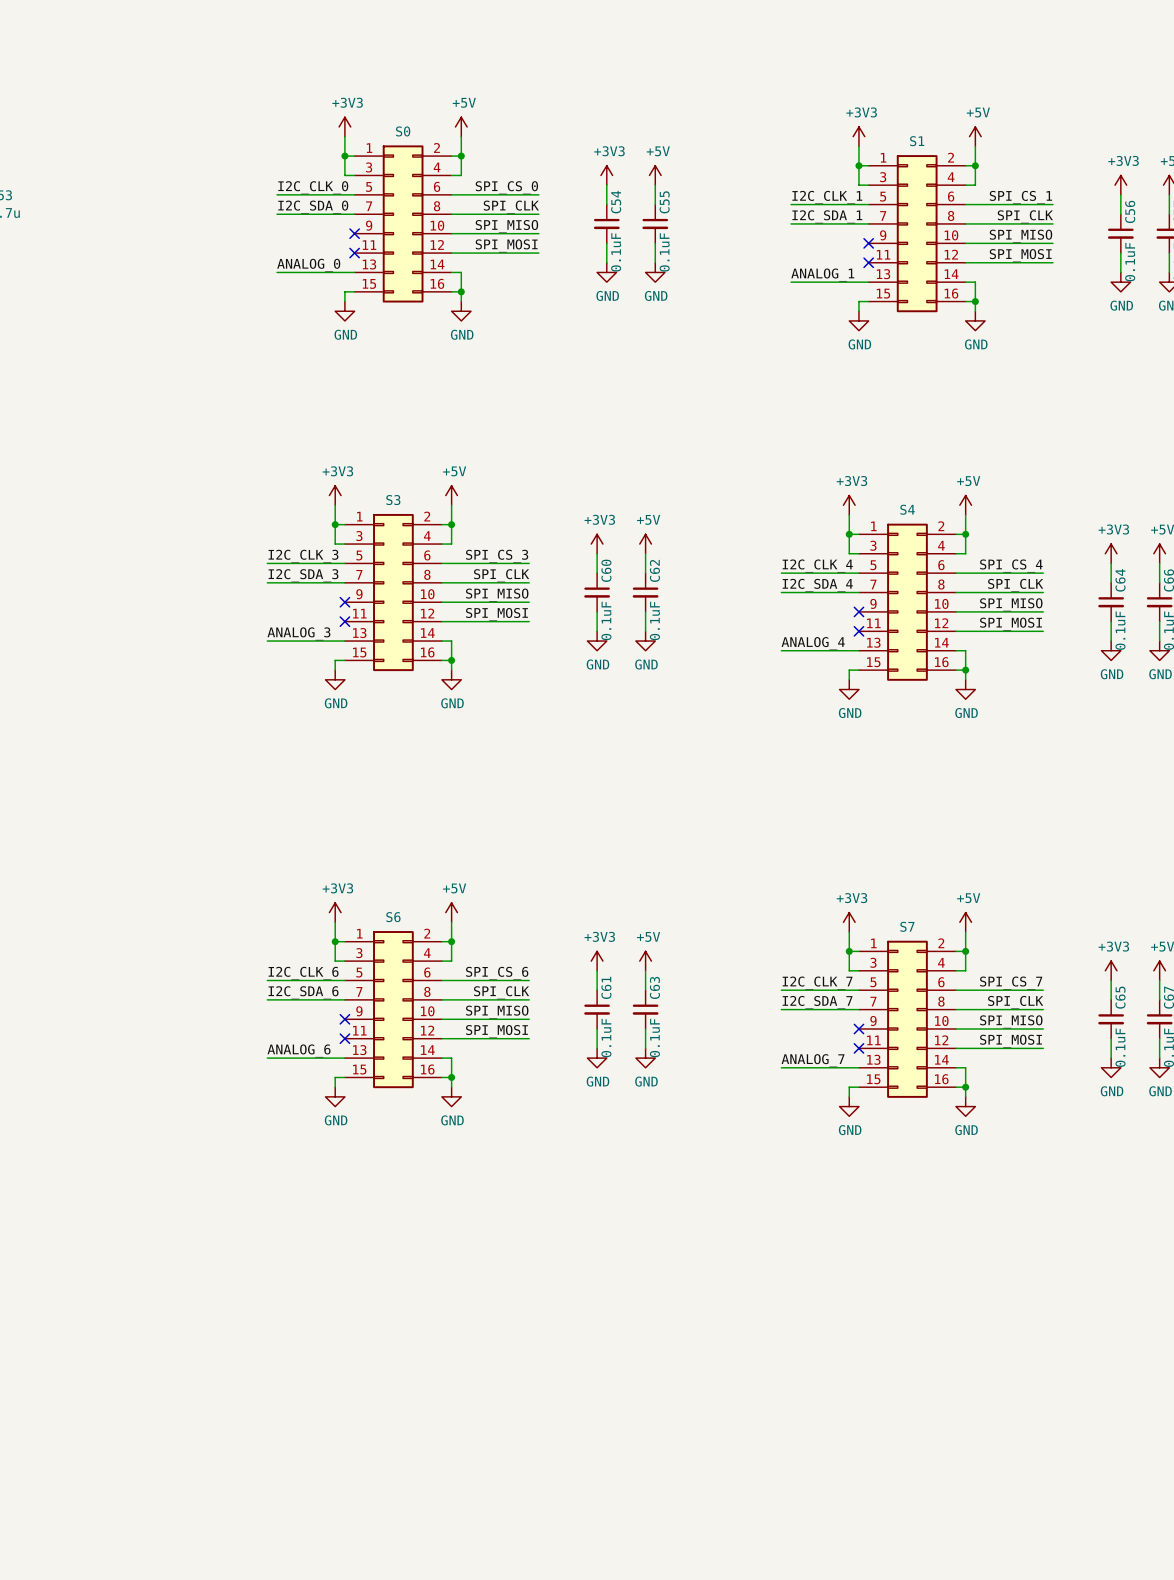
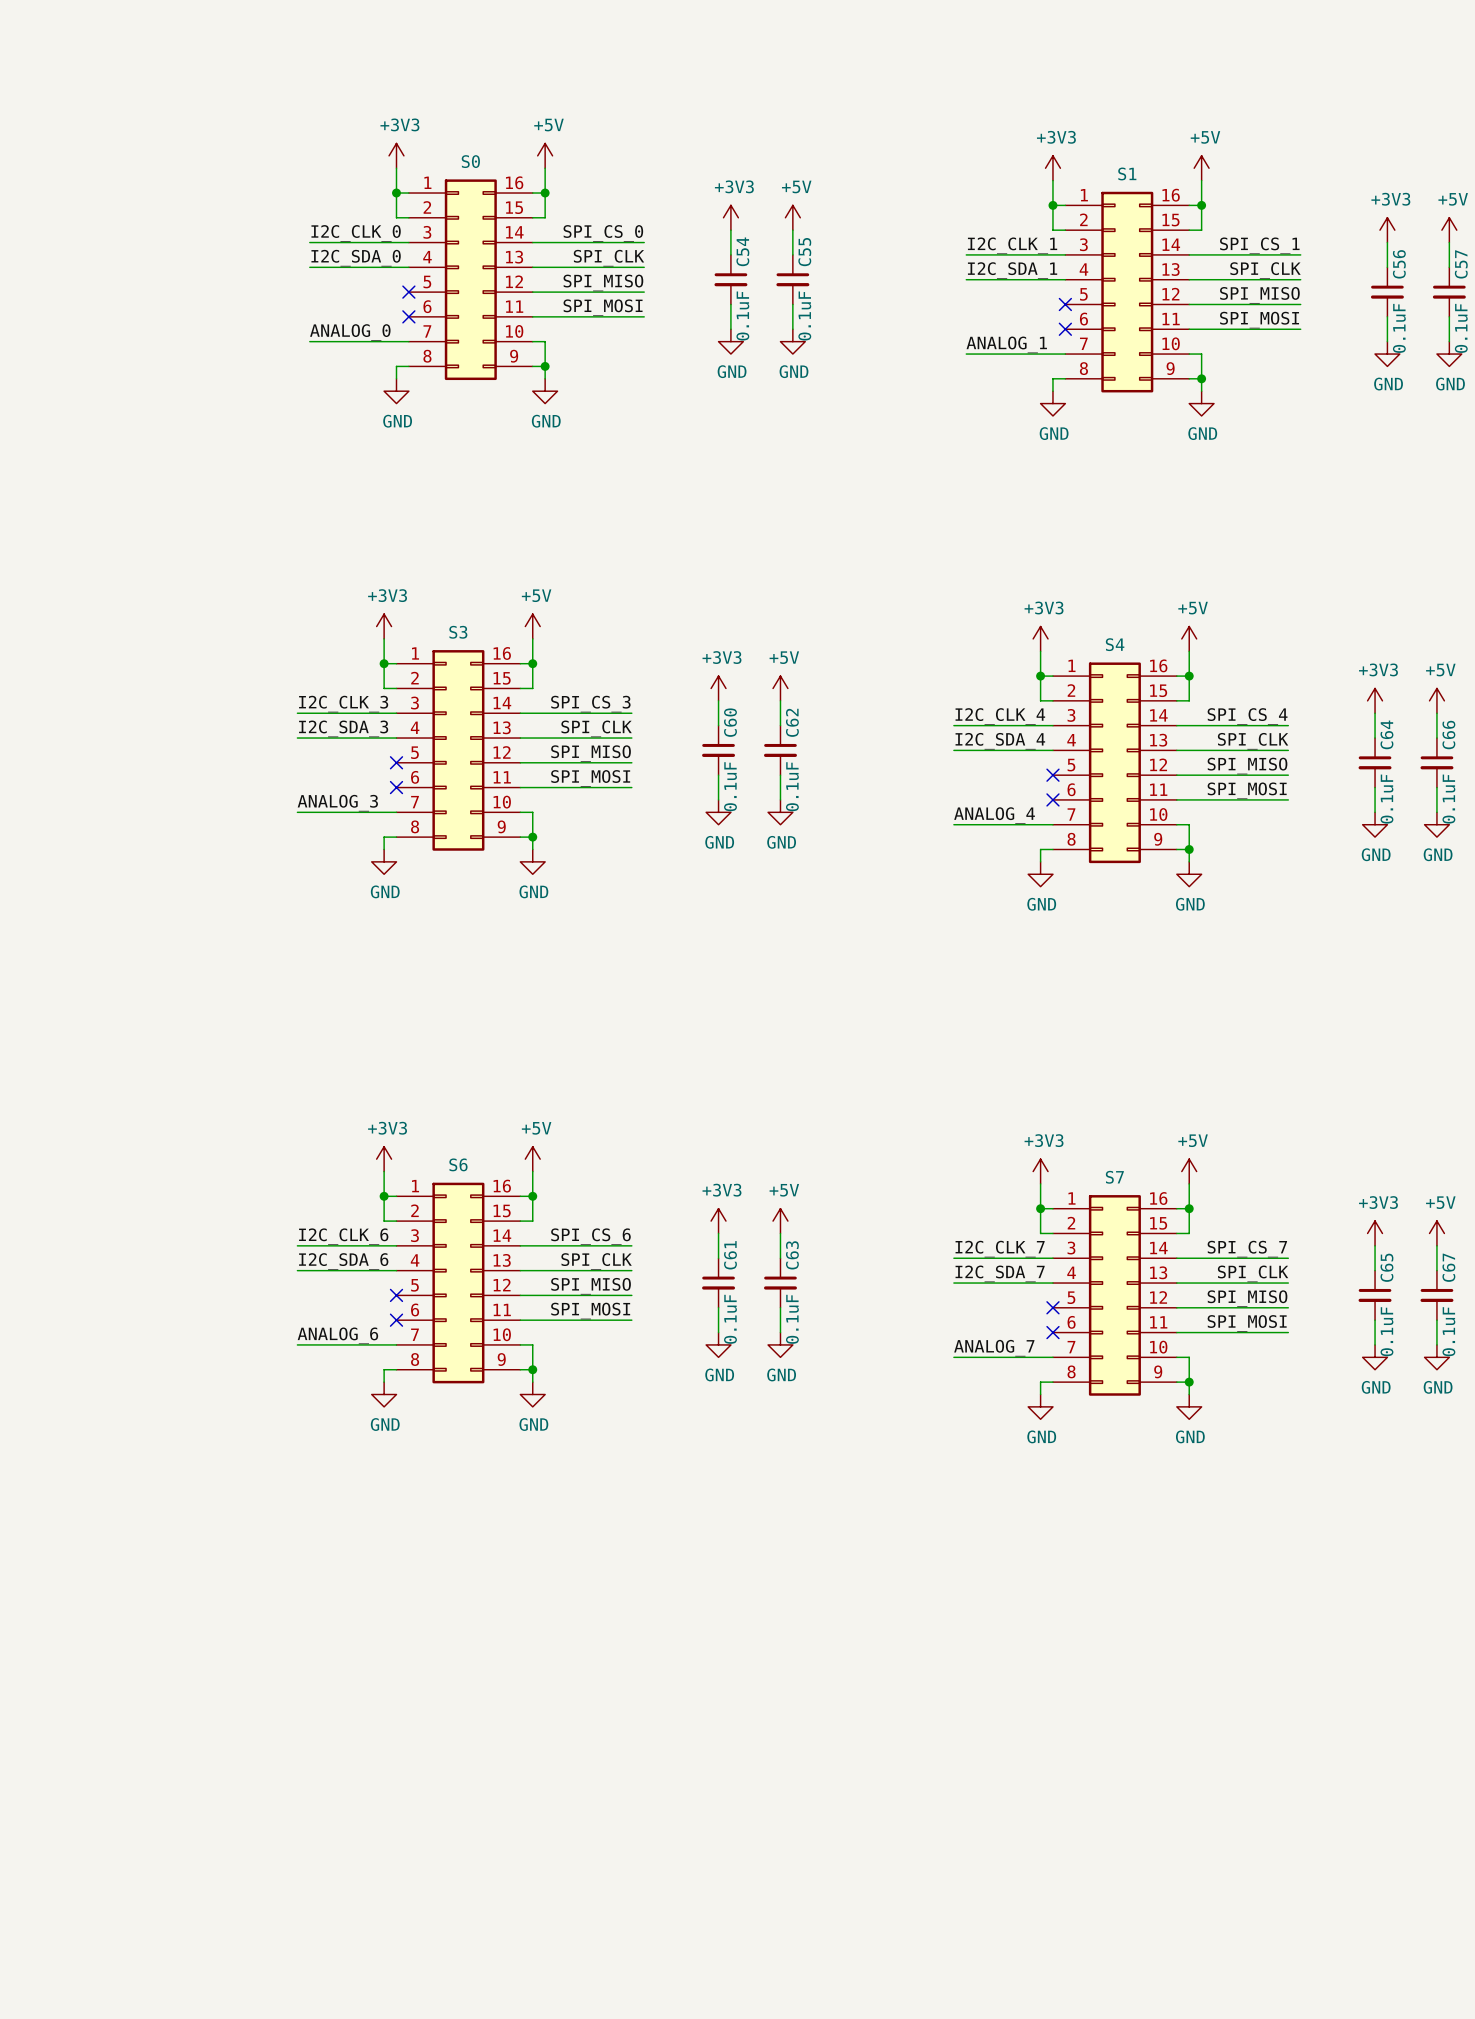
S0 symbol: [354, 145, 452, 303] -> [408, 179, 533, 381]
S1 symbol: [868, 155, 966, 313] -> [1065, 191, 1190, 393]
S3 symbol: [344, 513, 442, 672] -> [396, 650, 521, 851]
S4 symbol: [858, 523, 956, 681] -> [1052, 662, 1177, 864]
S6 symbol: [344, 931, 442, 1089] -> [396, 1182, 521, 1384]
S7 symbol: [858, 940, 956, 1098] -> [1052, 1195, 1177, 1396]

